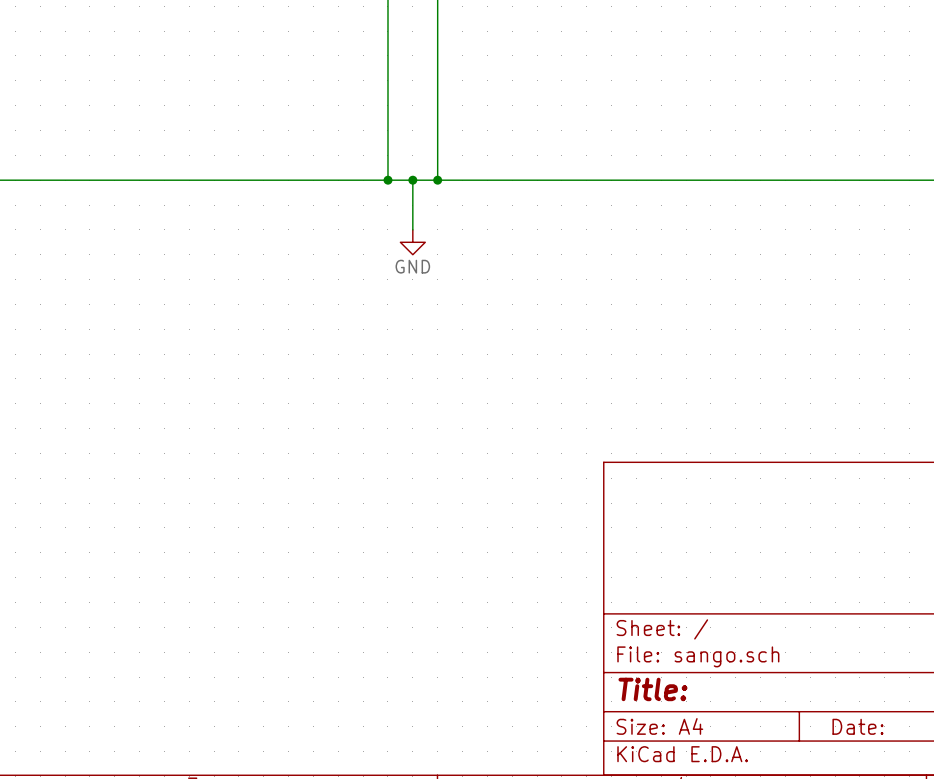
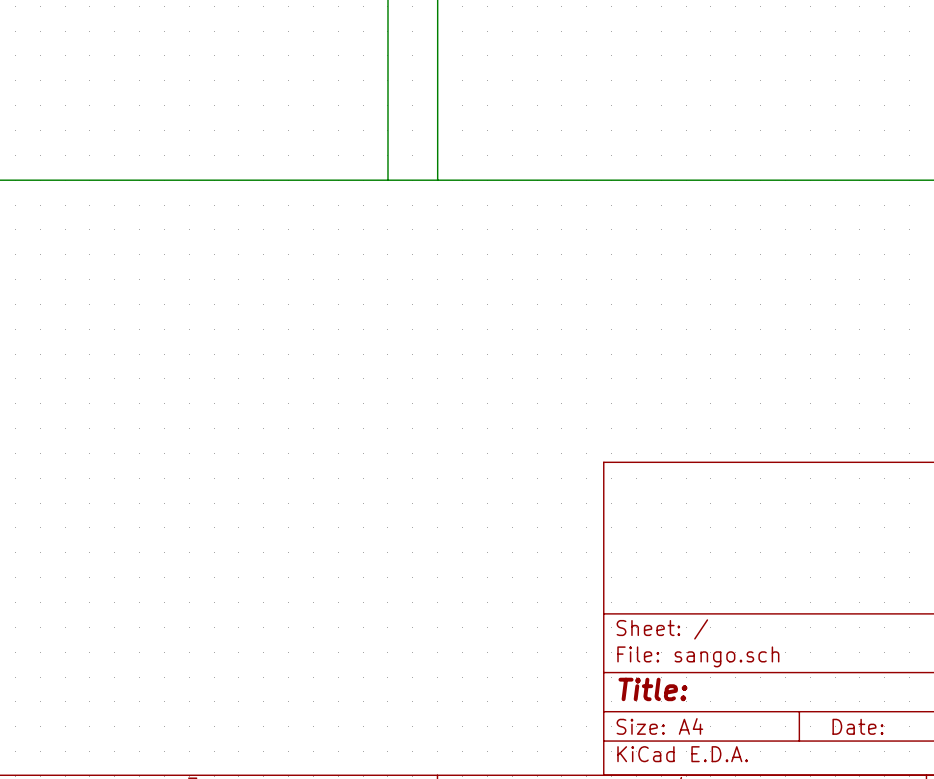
junction: (387, 180) -> none
wire: (412, 180) (412, 229) -> none
junction: (412, 180) -> none
junction: (437, 180) -> none
power symbol: GND (412, 242) -> none

